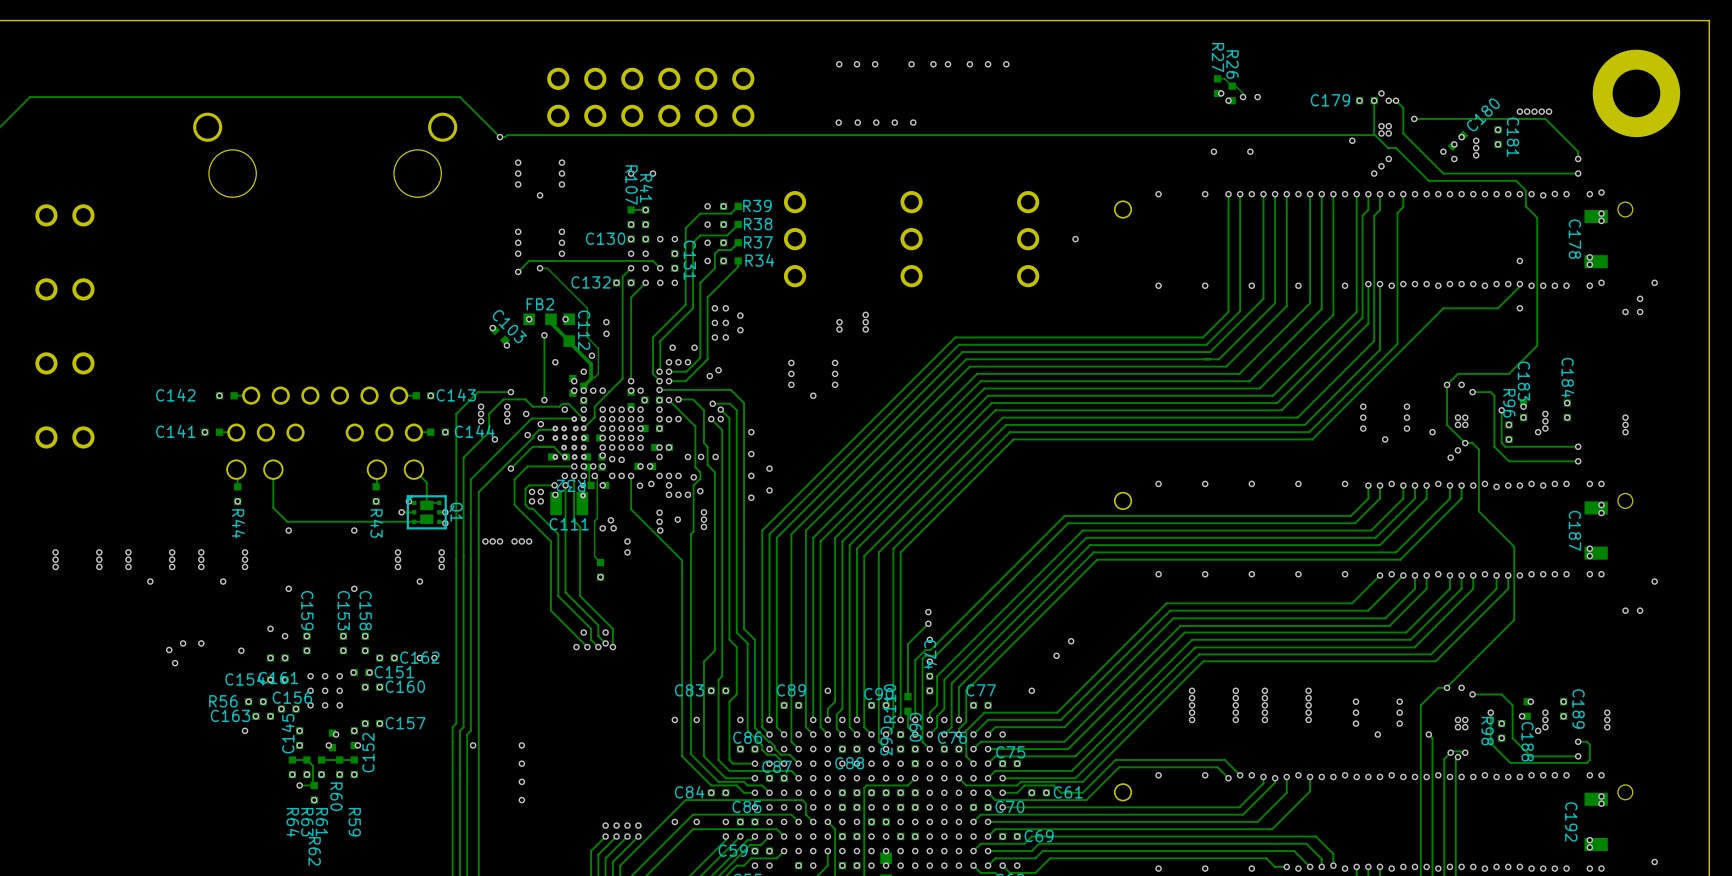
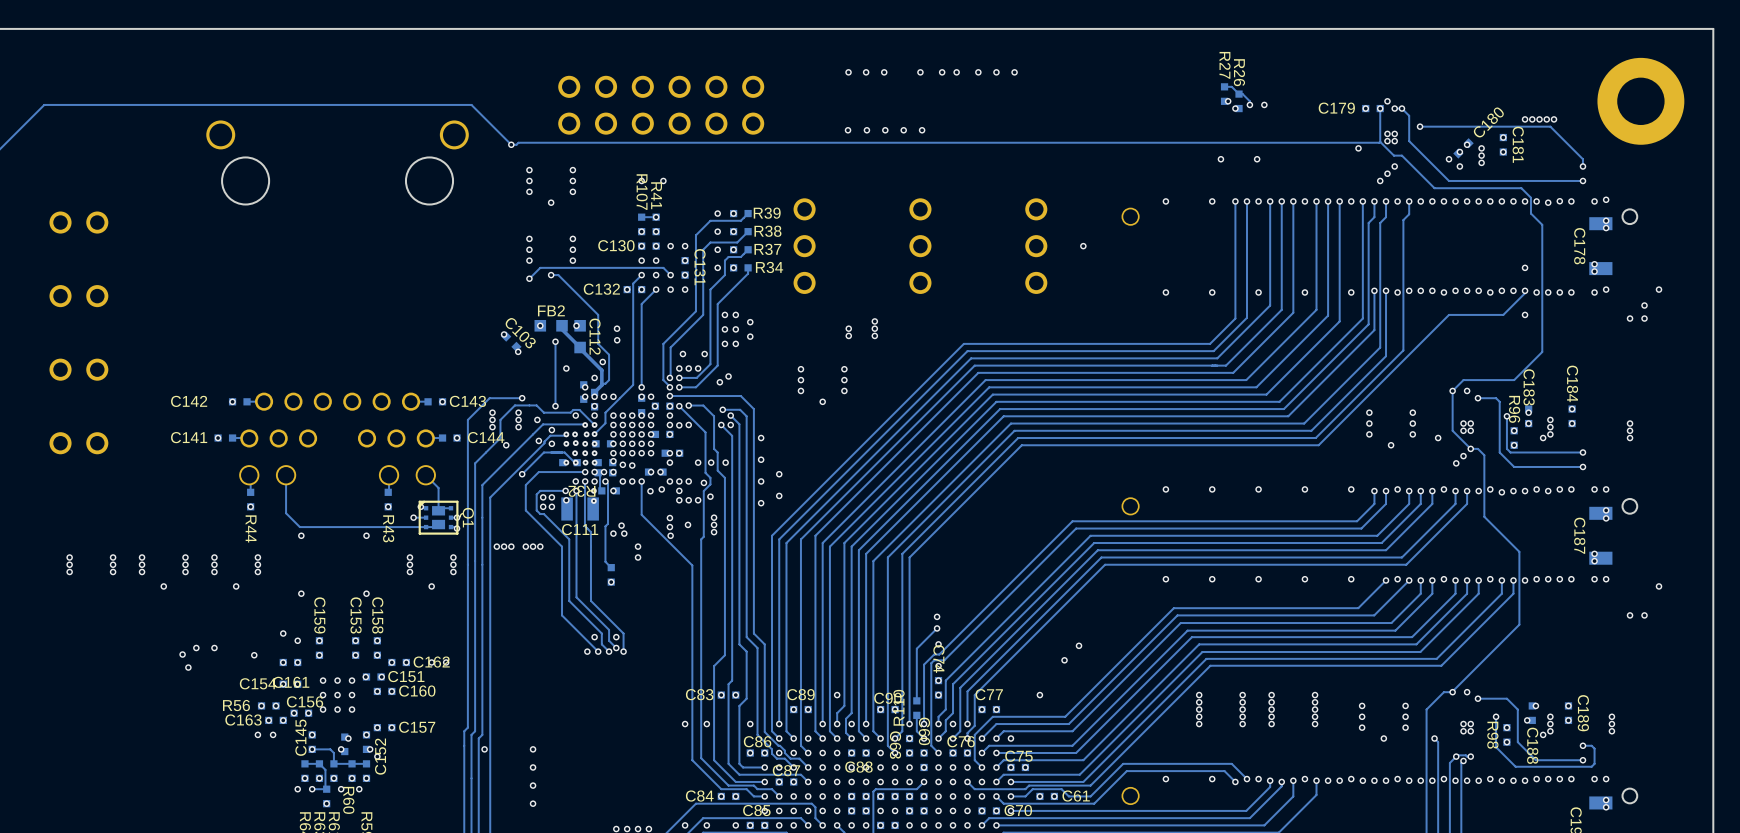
via: none -> (273, 734)
track: none -> (312, 749) (330, 749) (333, 752) (333, 763)
via: none -> (377, 756)
via: none -> (297, 789)
via: none -> (341, 789)
via: none -> (359, 789)

